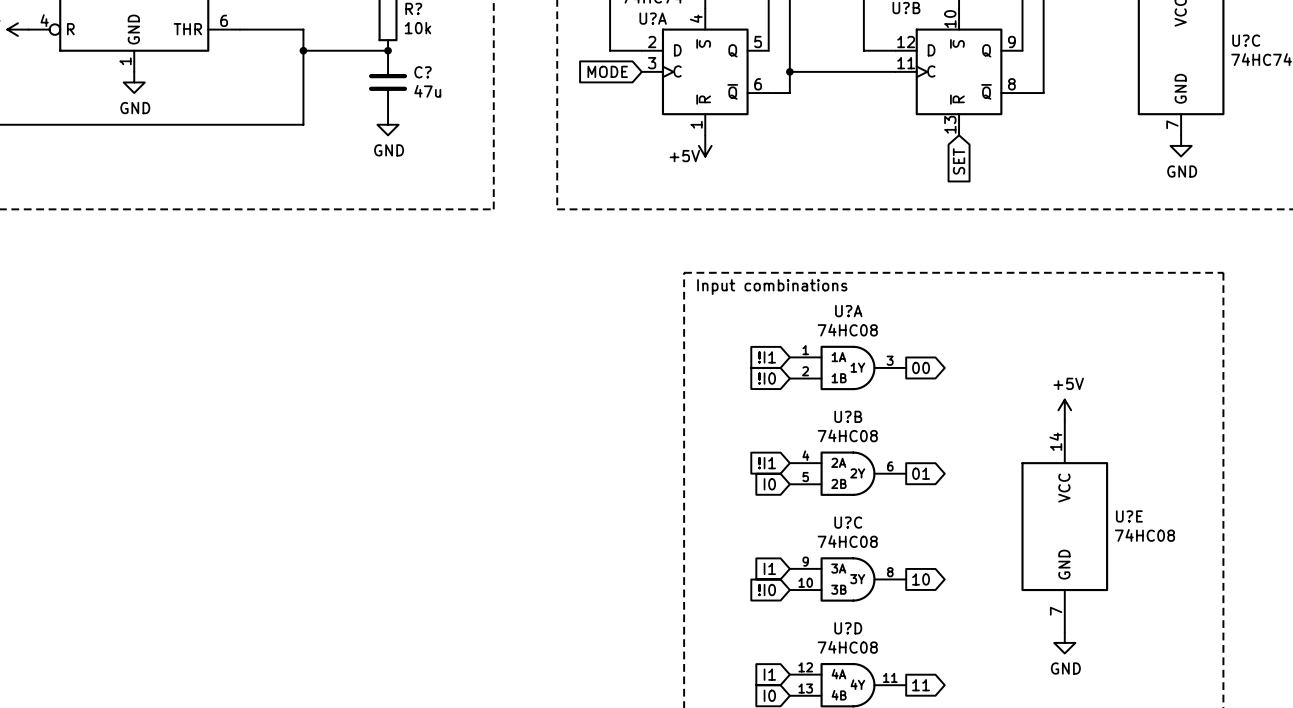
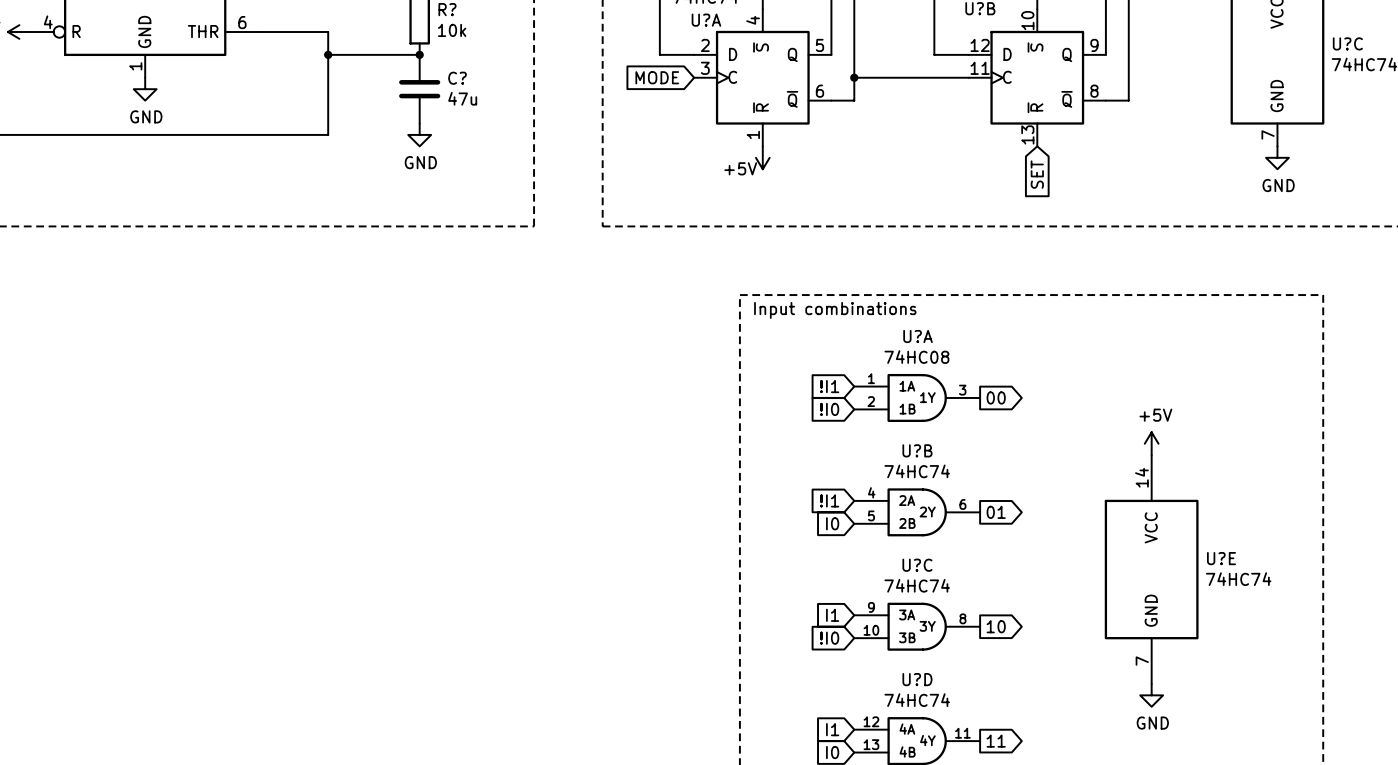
U?B value: 74HC08 (847, 435) -> 74HC74 (917, 471)
U?E value: 74HC08 (1144, 535) -> 74HC74 (1238, 579)
U?C value: 74HC08 (847, 541) -> 74HC74 (917, 585)
U?D value: 74HC08 (847, 647) -> 74HC74 (917, 700)

